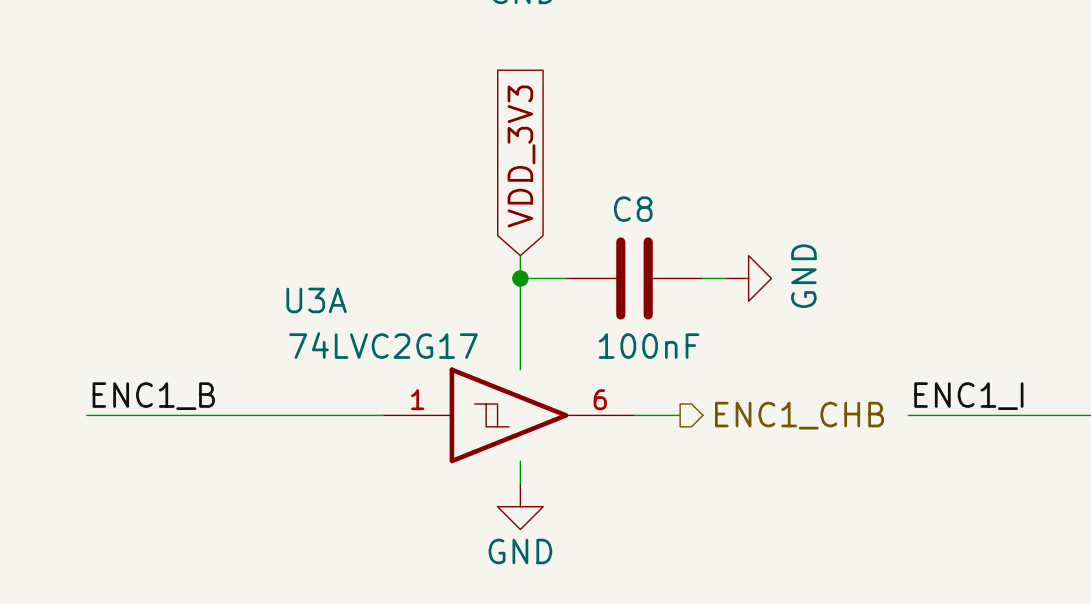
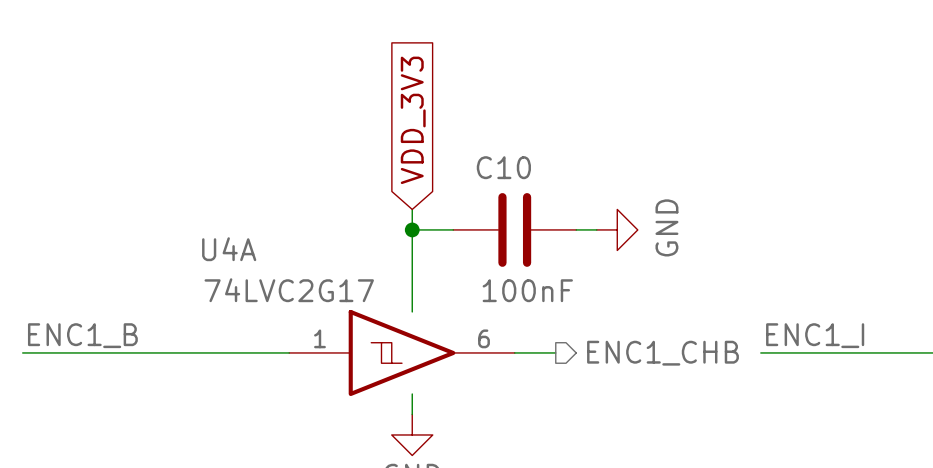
C8 name: C8 (633, 209) -> C10 (503, 167)
U3A name: U3A (316, 300) -> U4A (229, 249)

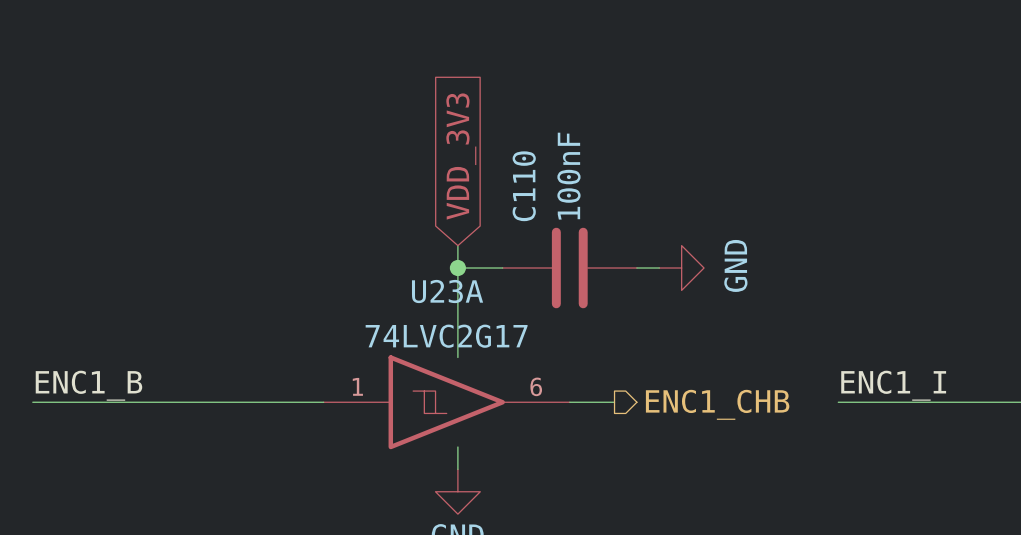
C10 name: C10 (503, 167) -> C110 (524, 186)
U4A name: U4A (229, 249) -> U23A (447, 291)
U4A value position: 74LVC2G17 (289, 290) -> 74LVC2G17 (446, 336)
C10 value rotation: 0° (527, 290) -> 90° counterclockwise (568, 176)
C10 value position: 100nF (527, 290) -> 100nF (568, 176)

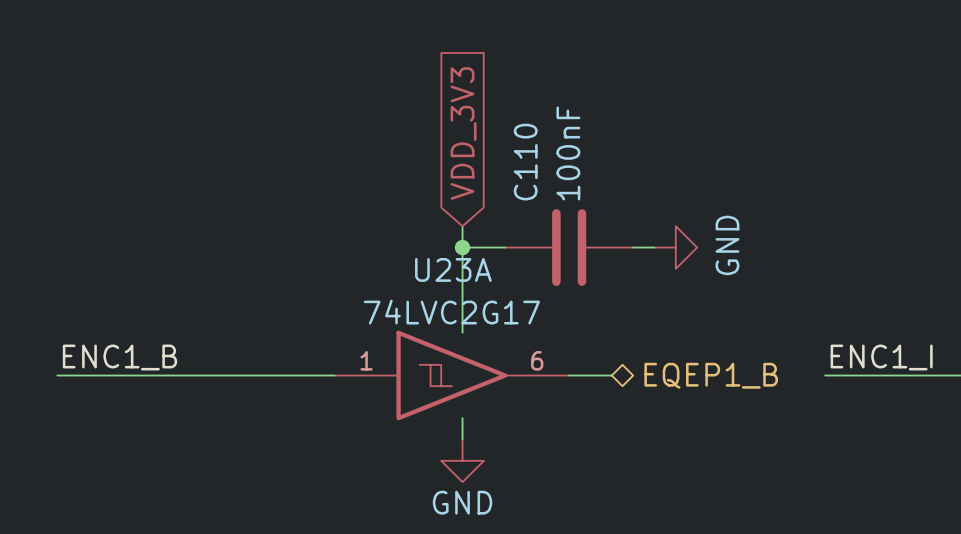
hierarchical label shape: output (717, 404) -> bidirectional (711, 375)
hierarchical label: ENC1_CHB (717, 404) -> EQEP1_B (711, 375)

